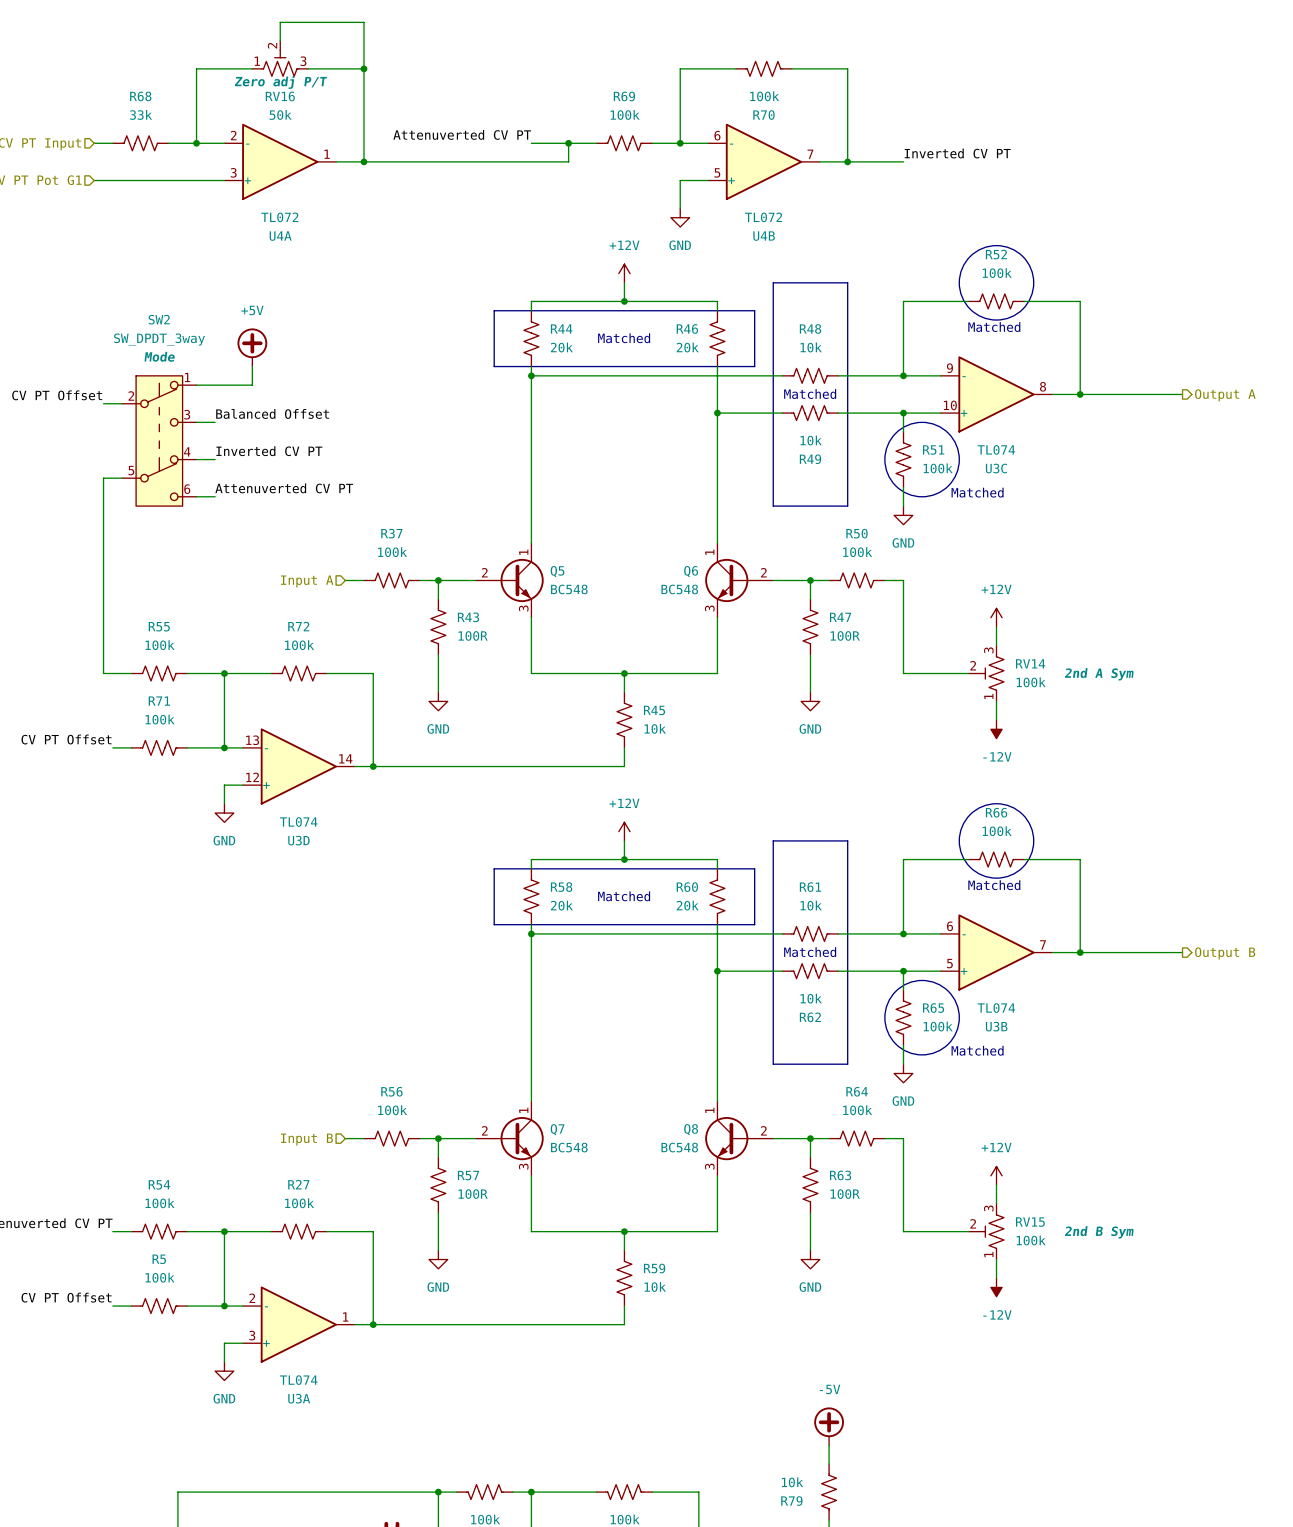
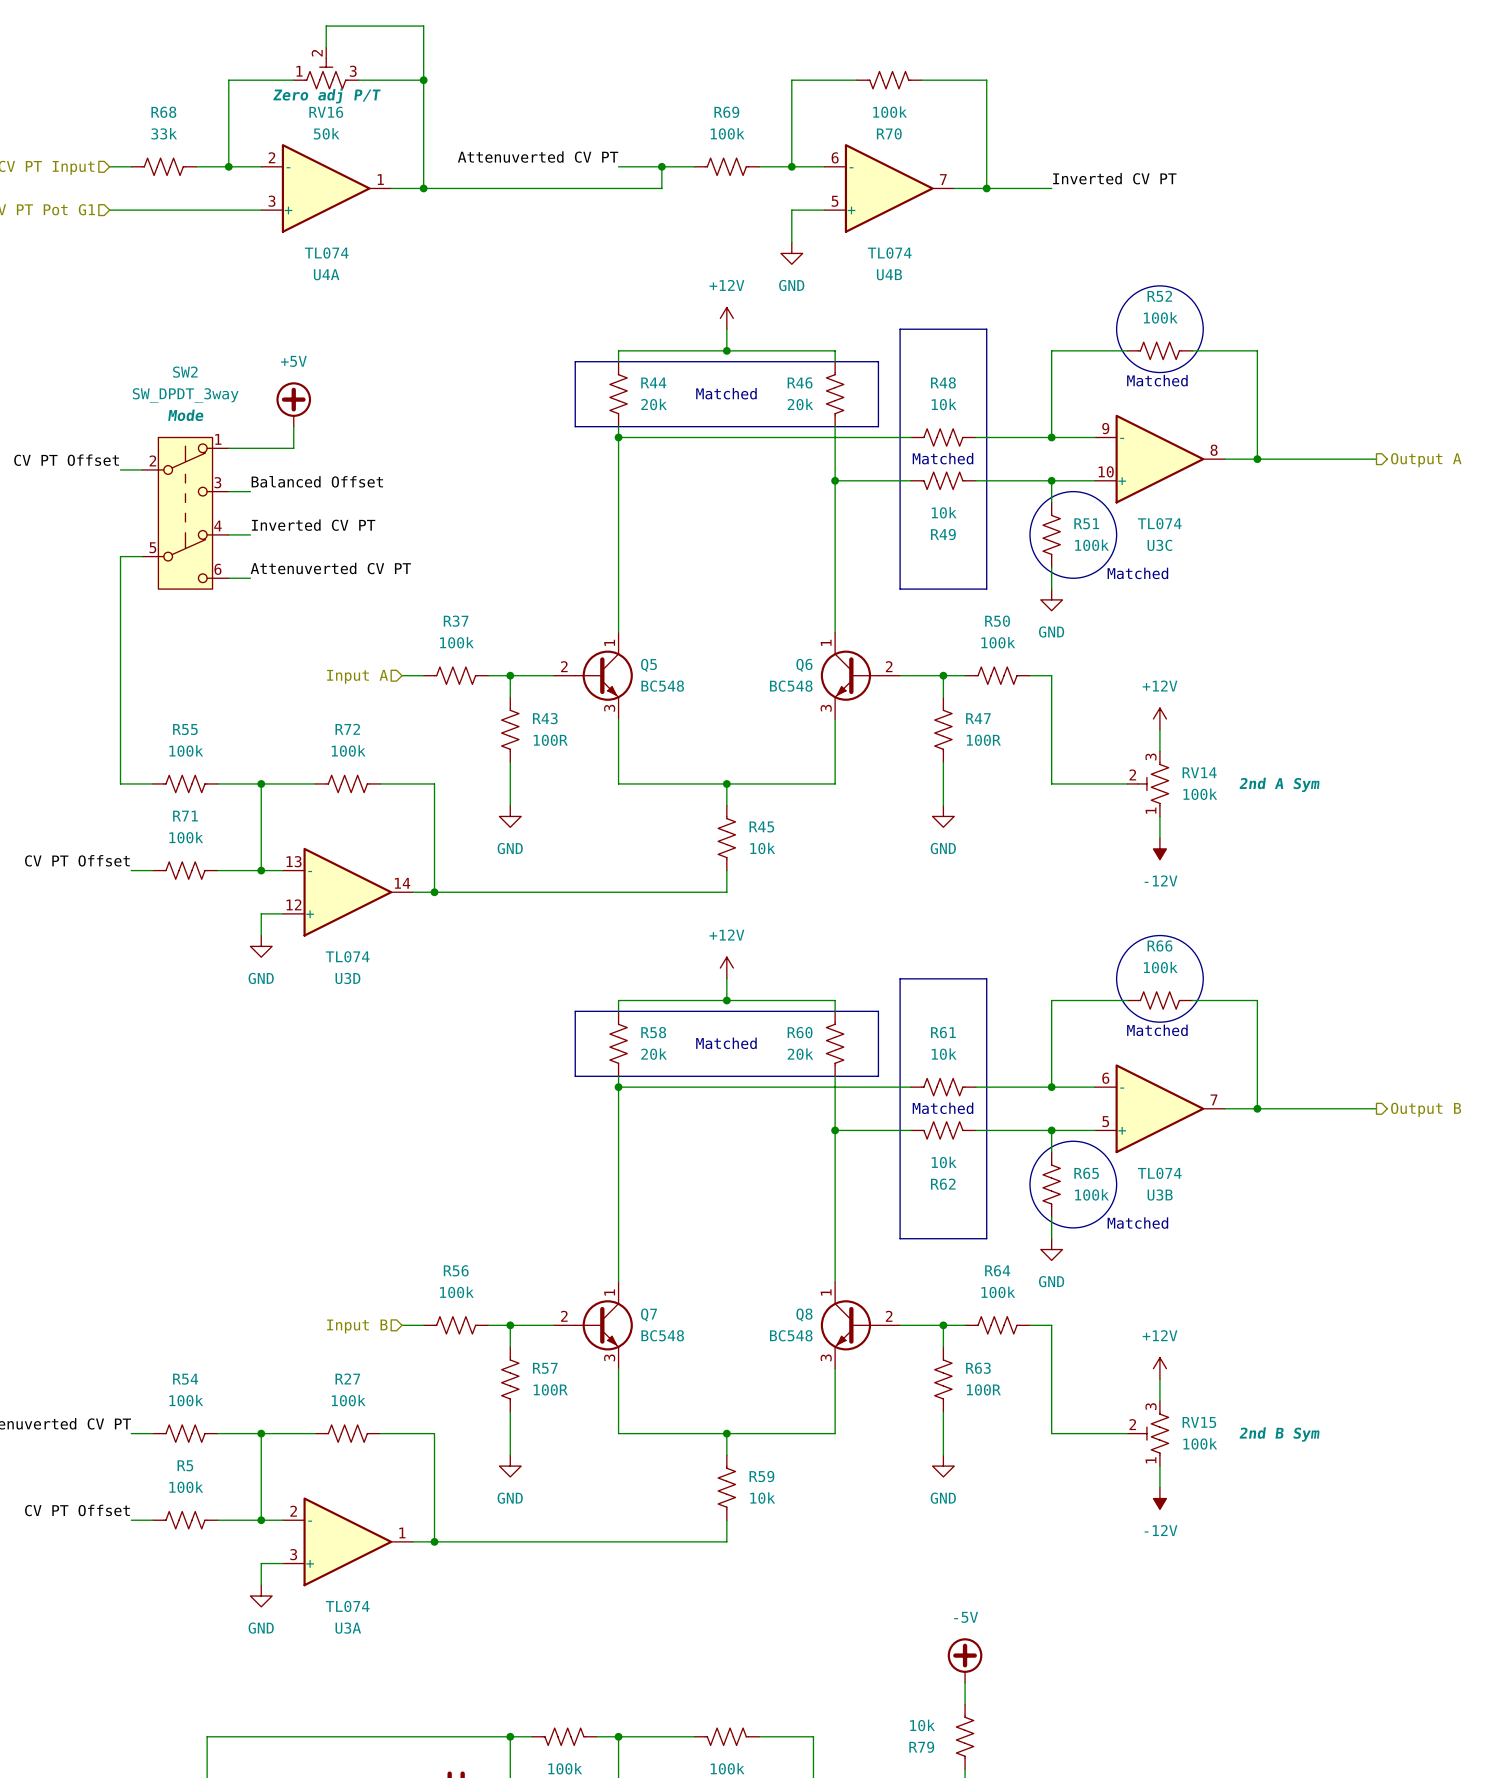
U4A value: TL072 (279, 217) -> TL074 (326, 253)
U4B value: TL072 (763, 217) -> TL074 (889, 253)

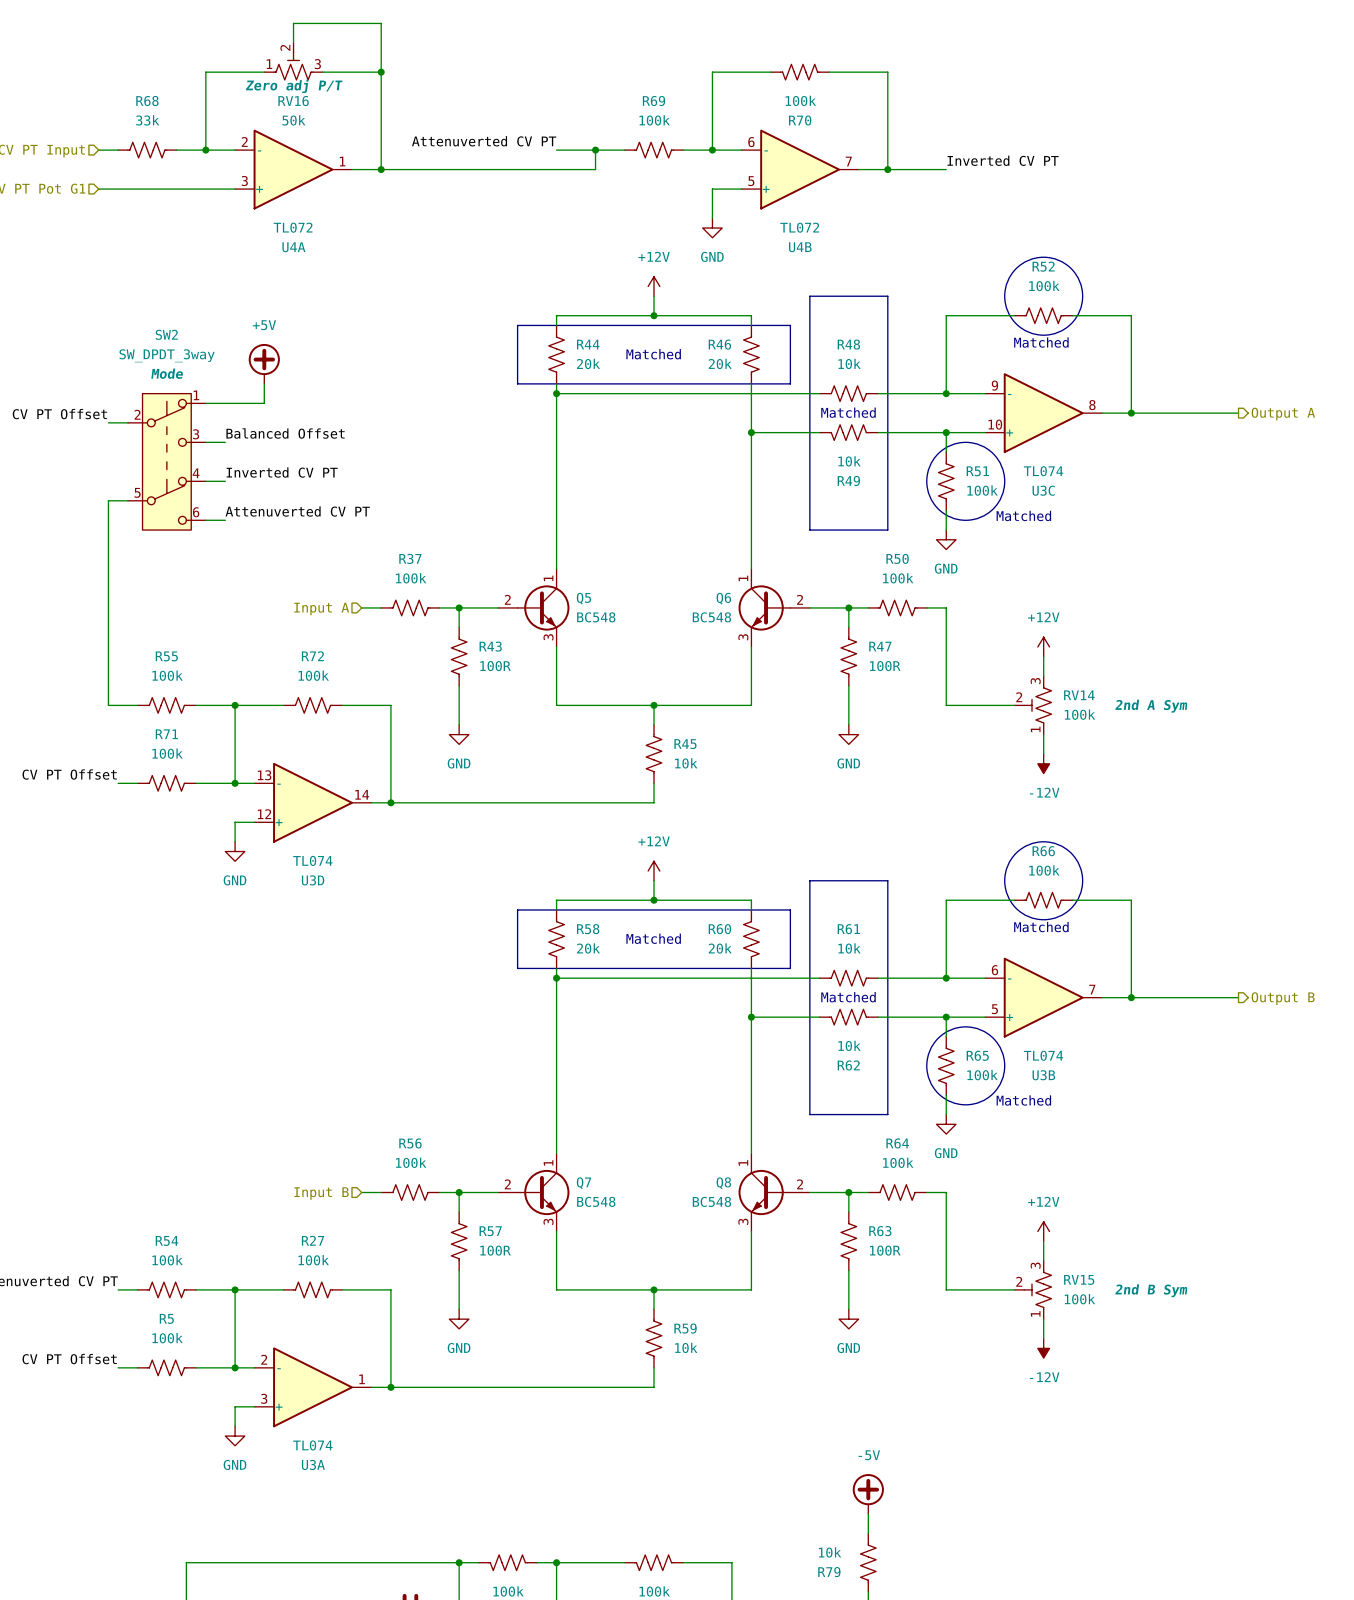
U4A value: TL074 (326, 253) -> TL072 (293, 227)
U4B value: TL074 (889, 253) -> TL072 (799, 227)

